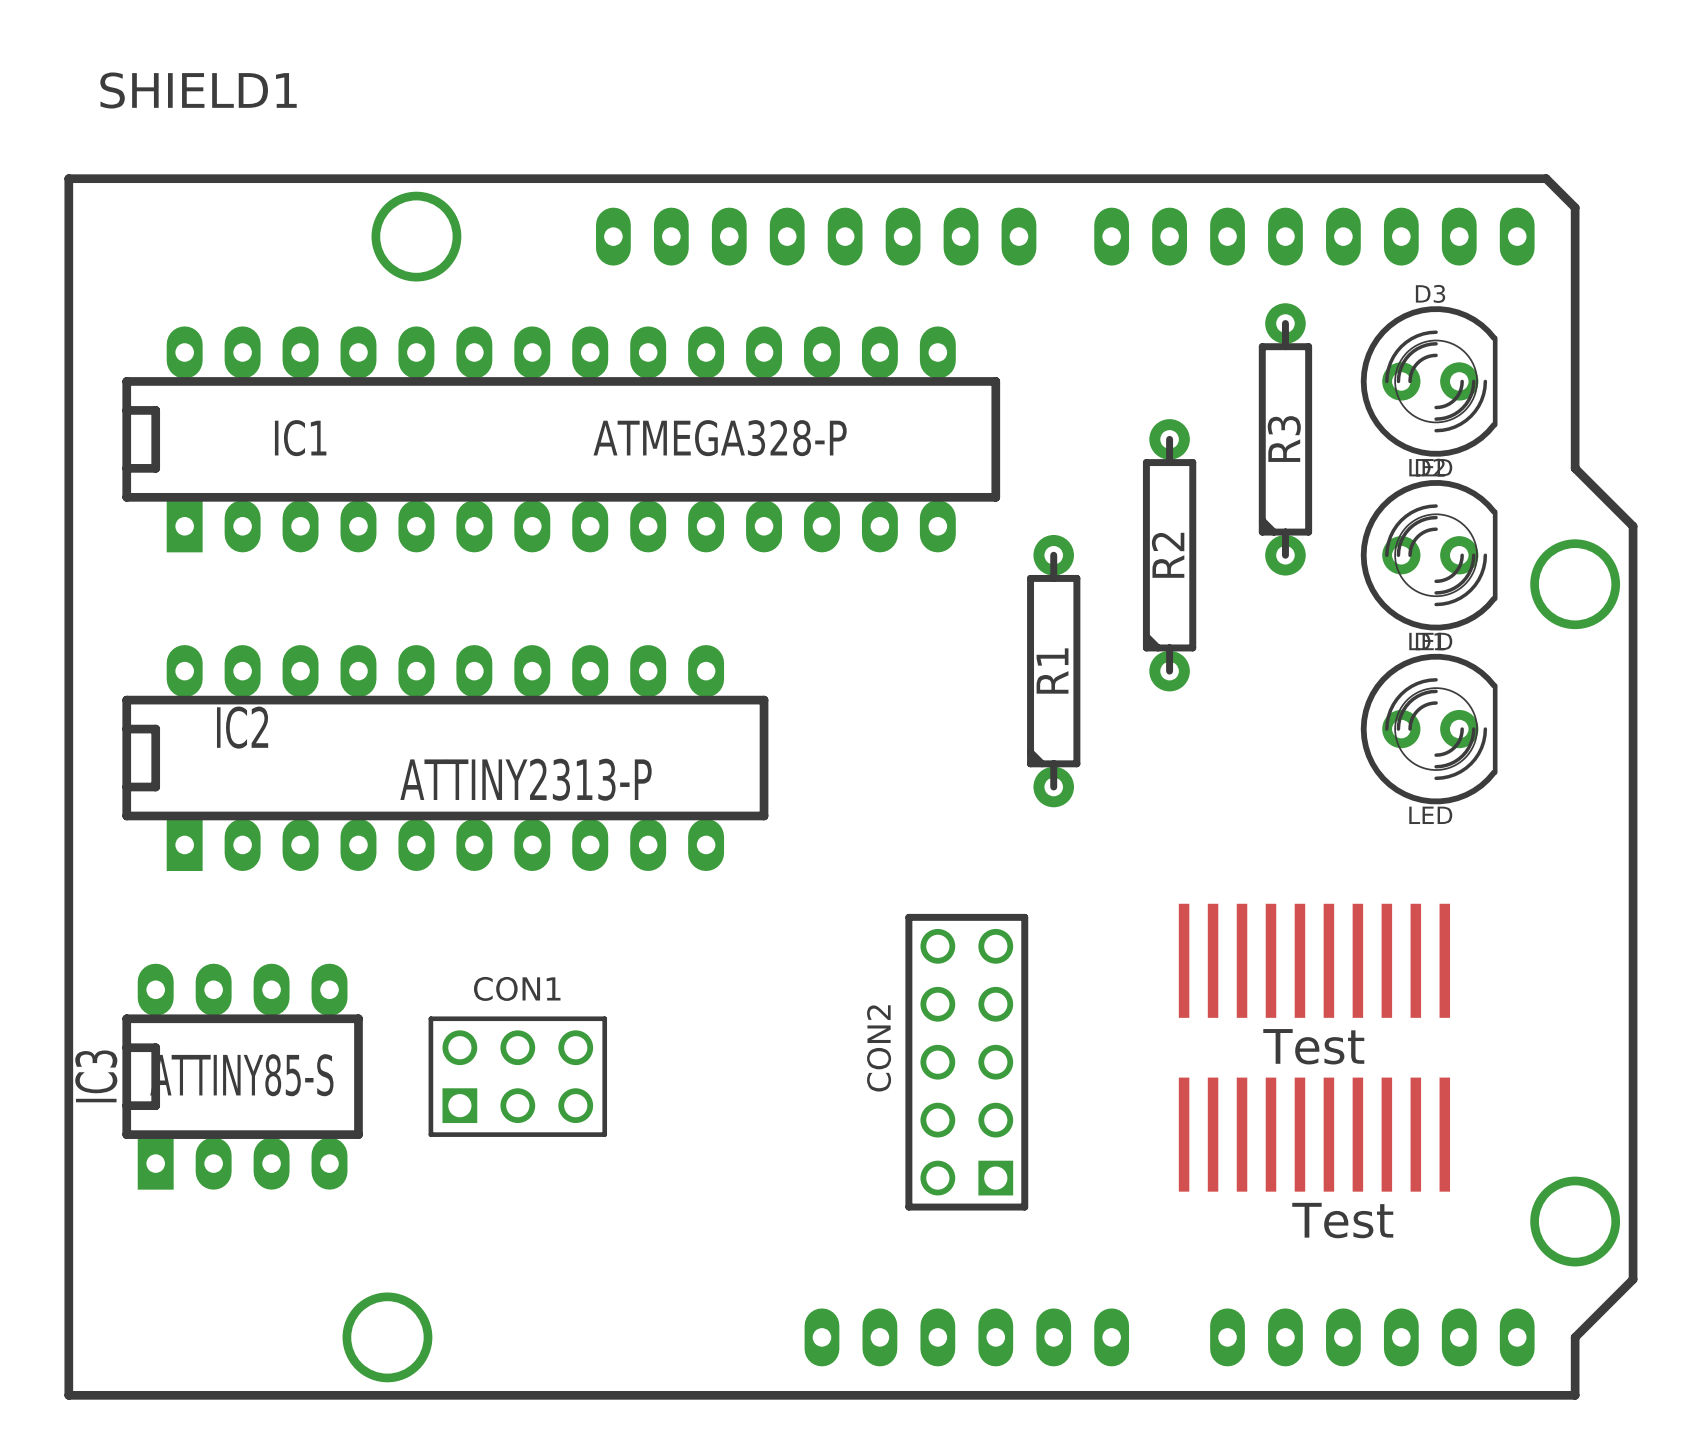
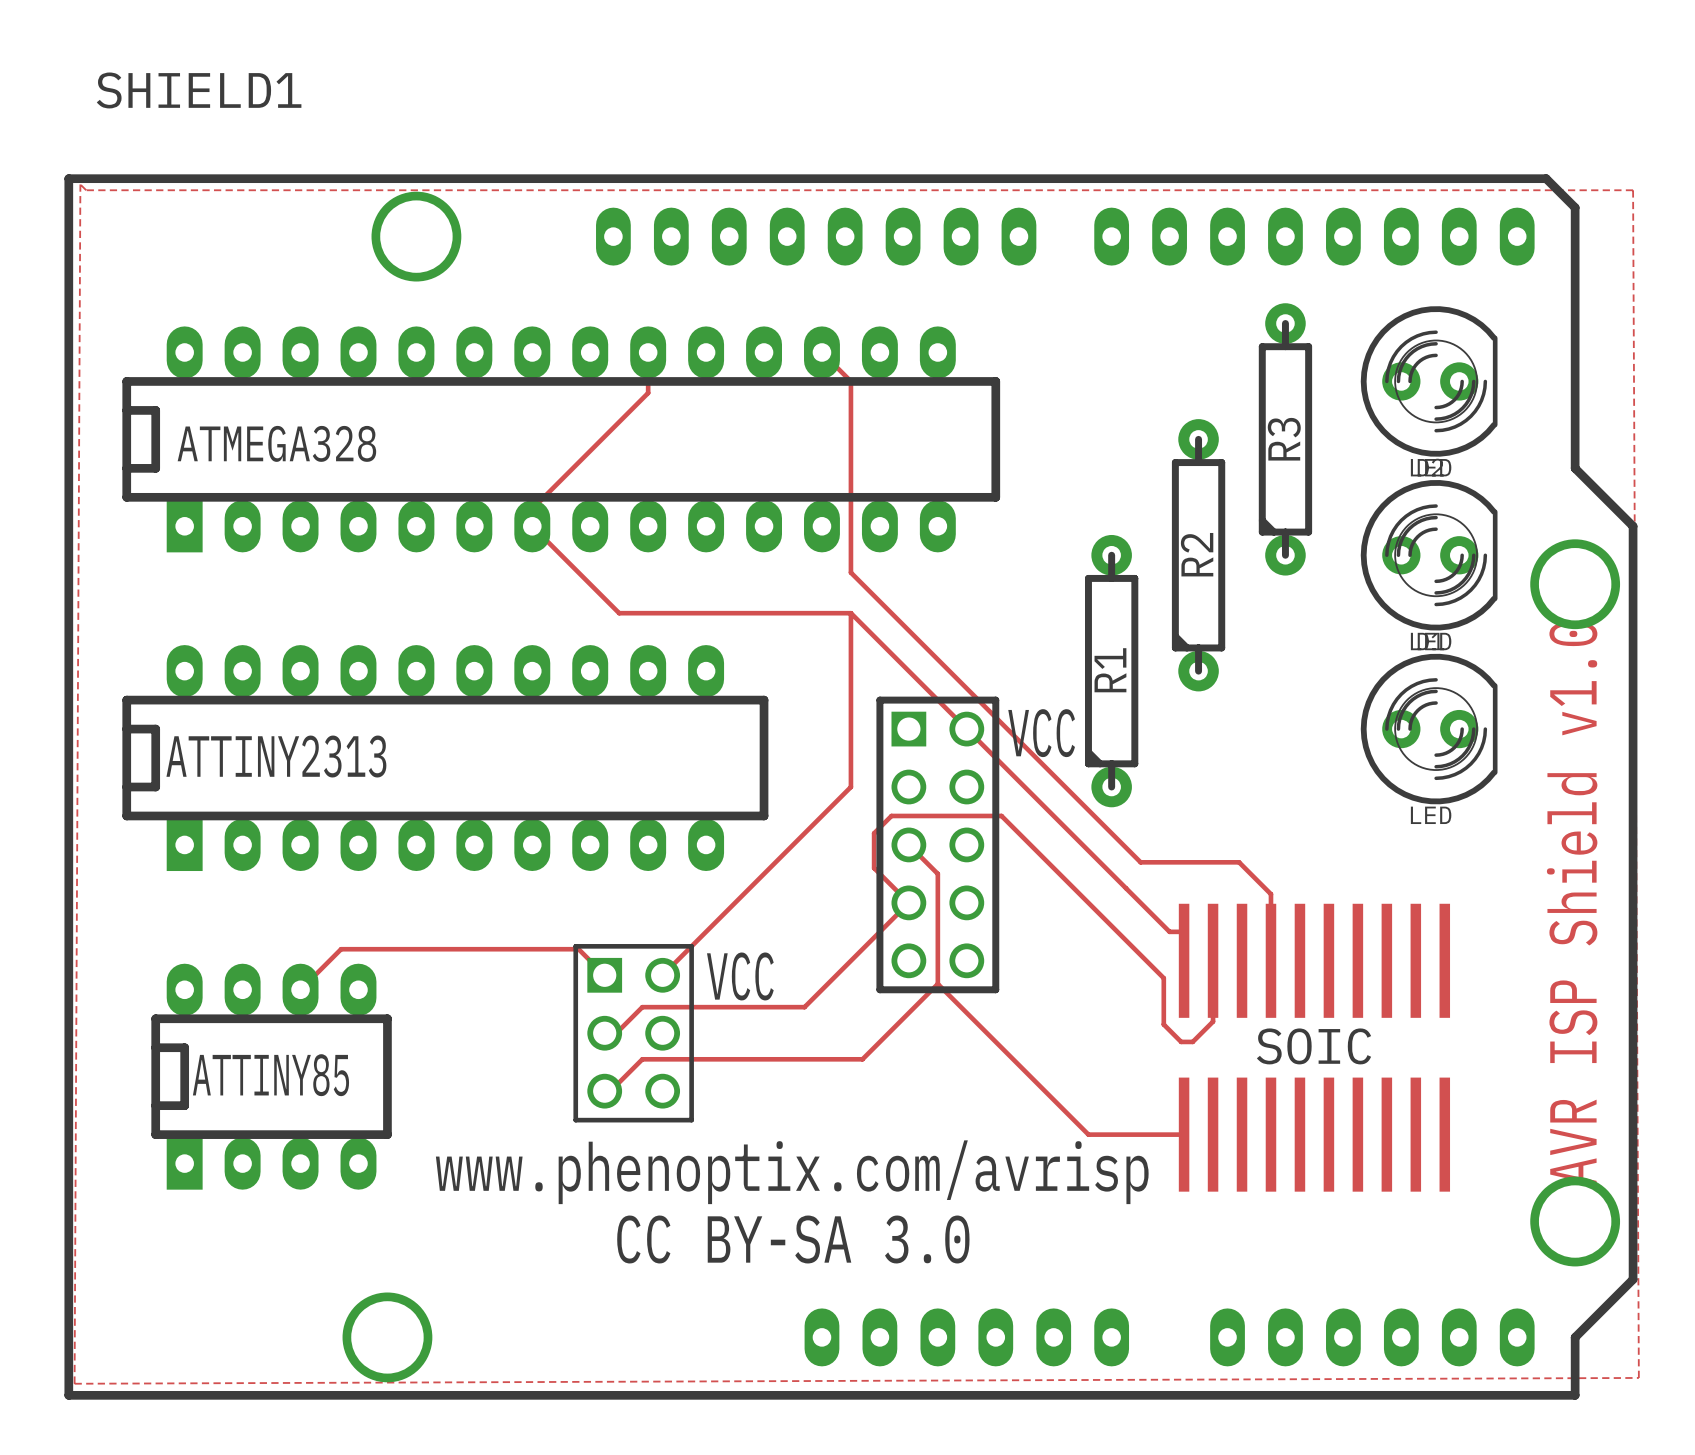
zone outline: none -> (80, 184) (86, 190) (1633, 190) (1638, 1377) (74, 1383) (80, 184)
D3 name: D3 (1430, 293) -> none
track: none -> (648, 352) (648, 393) (532, 508) (532, 526) (619, 613) (850, 613)
track: none -> (821, 352) (850, 381) (850, 572) (1140, 862) (1239, 862) (1270, 894) (1270, 960)
IC1 name: IC1 (300, 438) -> none
IC1 value: ATMEGA328-P (720, 438) -> ATMEGA328 (276, 443)
R2 position: (1169, 555) -> (1198, 555)
track: none -> (850, 613) (1169, 931) (1184, 931) (1184, 960)
track: none -> (850, 613) (850, 787) (662, 975)
R1 position: (1053, 671) -> (1111, 671)
IC2 name: IC2 (242, 727) -> none
text: none -> VCC (1041, 733)
IC2 value: ATTINY2313-P (526, 779) -> ATTINY2313 (276, 756)
track: none -> (908, 844) (937, 873) (937, 983)
part: none -> (937, 844)
text: none -> AVR ISP Shield v1.0 (1572, 903)
track: none -> (1213, 960) (1213, 1021) (1192, 1041) (1181, 1041) (1163, 1024) (1163, 978) (1001, 815) (891, 815) (874, 833) (874, 868) (908, 902) (804, 1007) (642, 1007) (616, 1033) (604, 1033)
track: none -> (604, 975) (578, 949) (341, 949) (300, 989)
text: none -> VCC (740, 976)
track: none -> (937, 983) (1088, 1134) (1184, 1134)
track: none -> (937, 983) (862, 1059) (642, 1059) (610, 1091) (604, 1091)
part: none -> (633, 1033)
Test name: Test (1313, 1046) -> SOIC (1314, 1046)
CON2: (966, 1062) -> none
IC3: ATTINY85-S (242, 1076) -> none
part: none -> ATTINY85 (271, 1076)
CON1: (517, 1076) -> none
text: none -> www.phenoptix.com/avrisp (792, 1172)
Test value: Test (1342, 1220) -> none
text: none -> CC BY-SA 3.0 (793, 1239)

